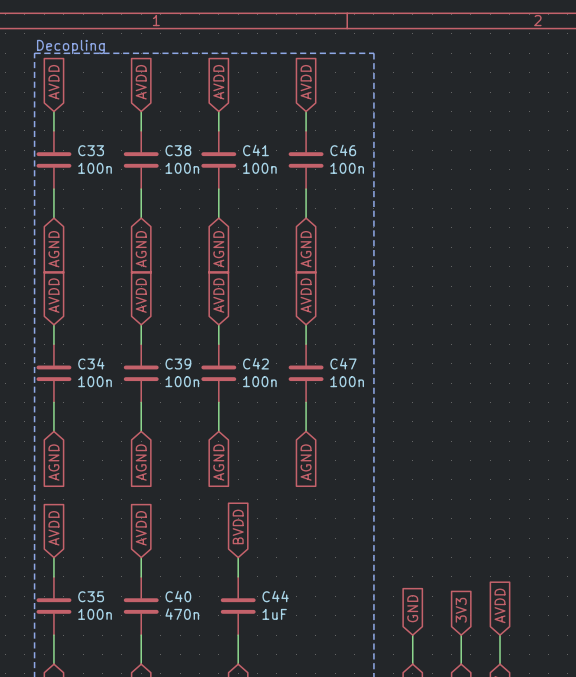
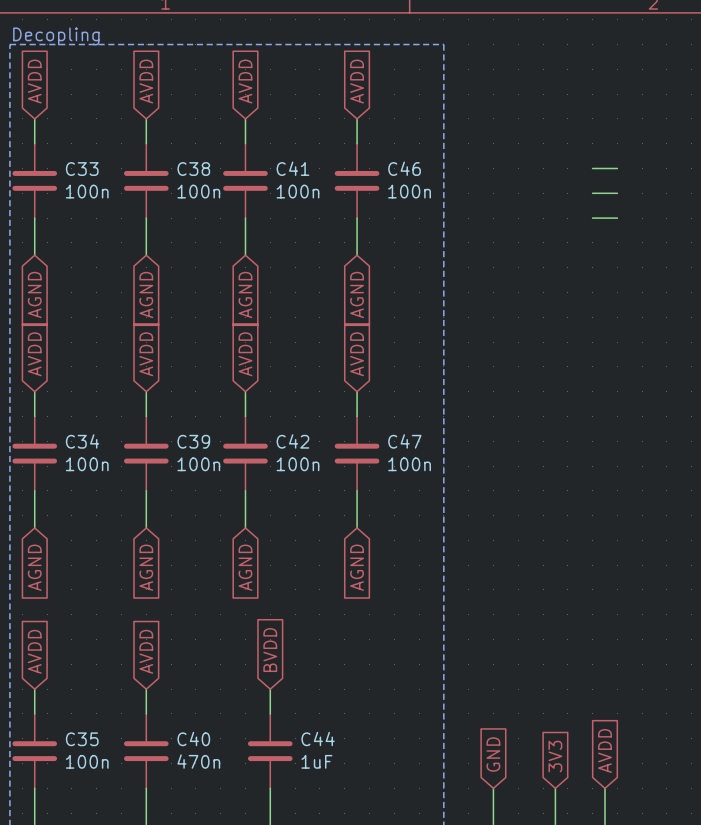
wire: none -> (592, 168) (617, 168)
wire: none -> (592, 193) (617, 193)
wire: none -> (592, 218) (617, 218)

